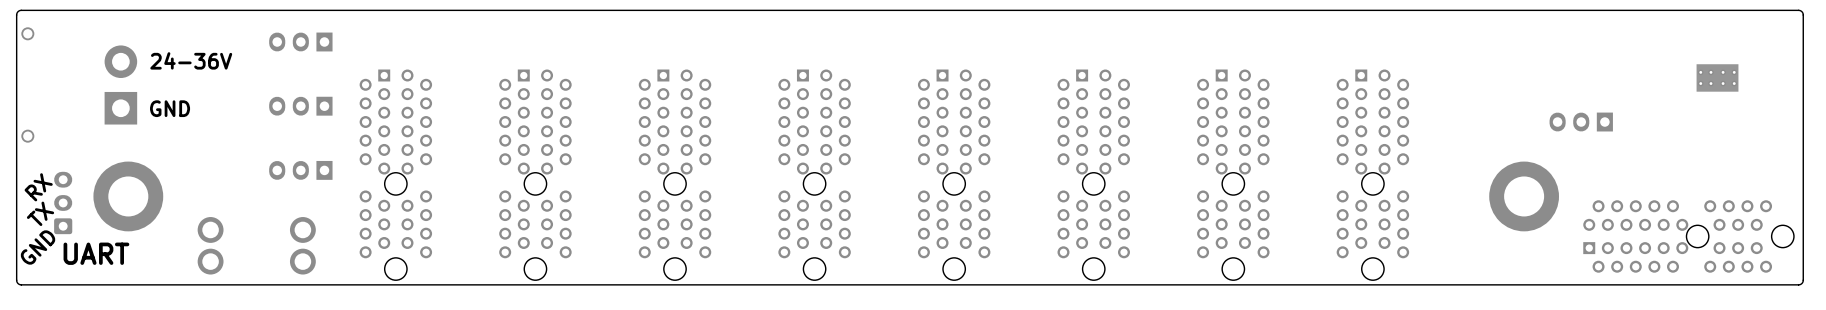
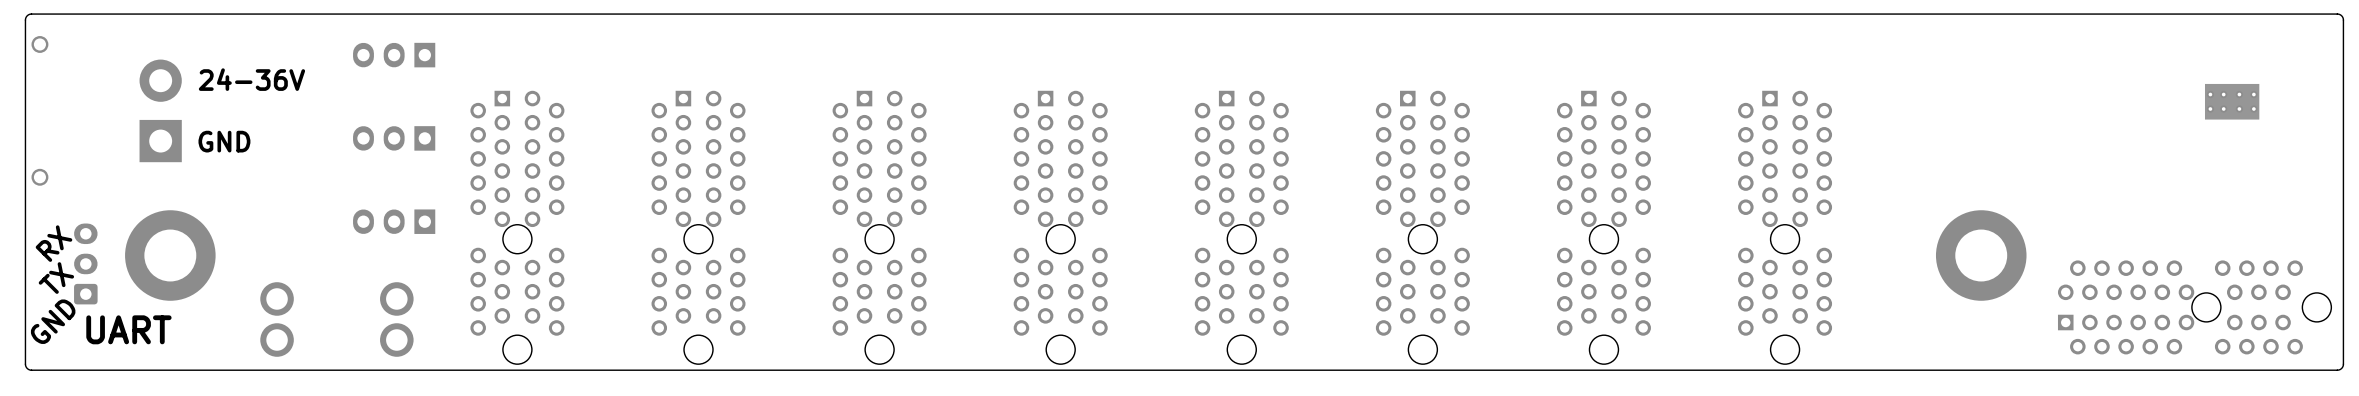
part: (1581, 122) -> none

